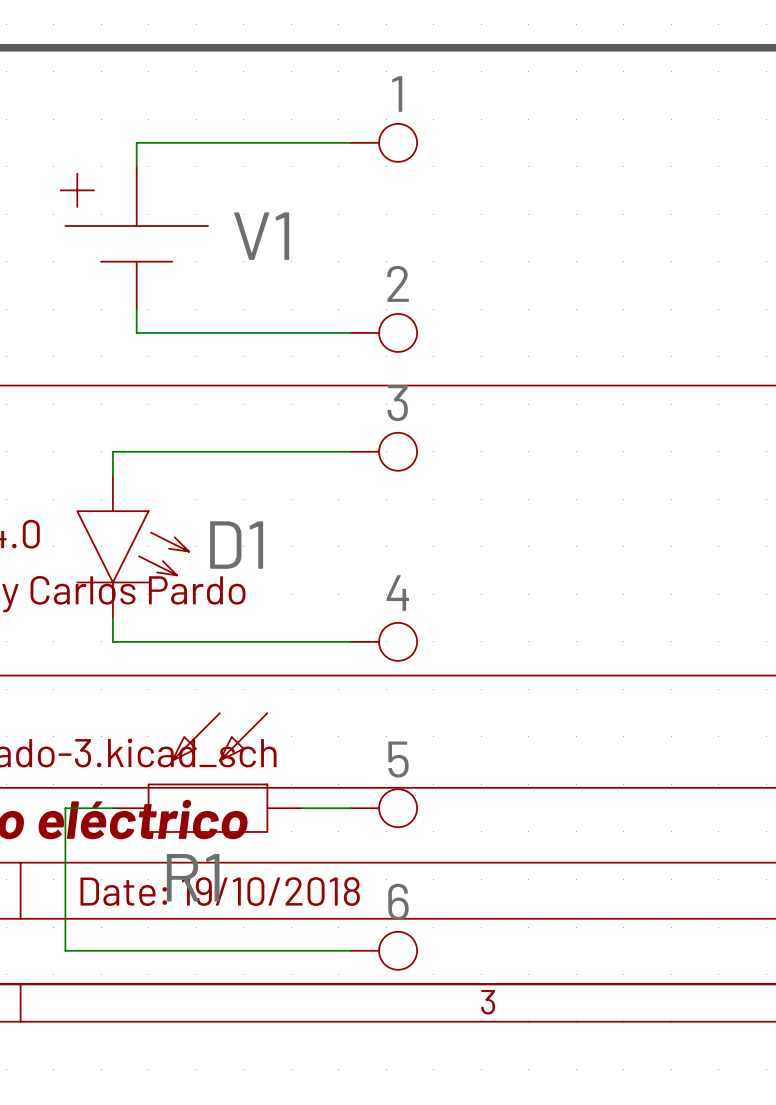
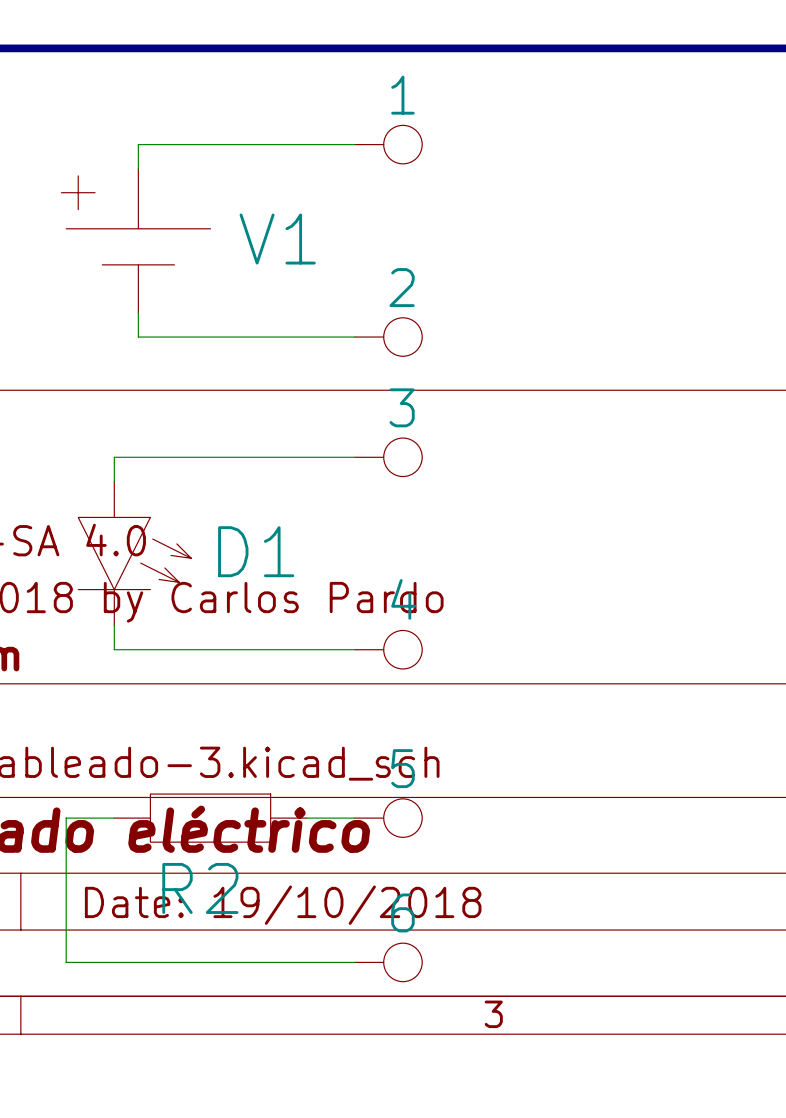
R1: (207, 772) -> none
R2: none -> (210, 818)

